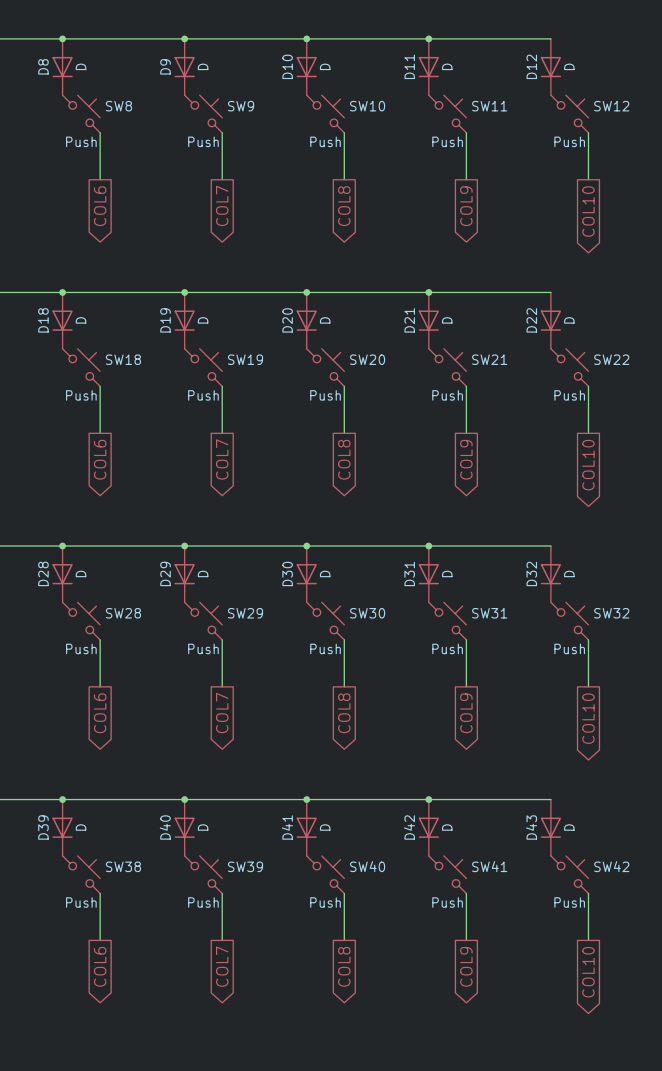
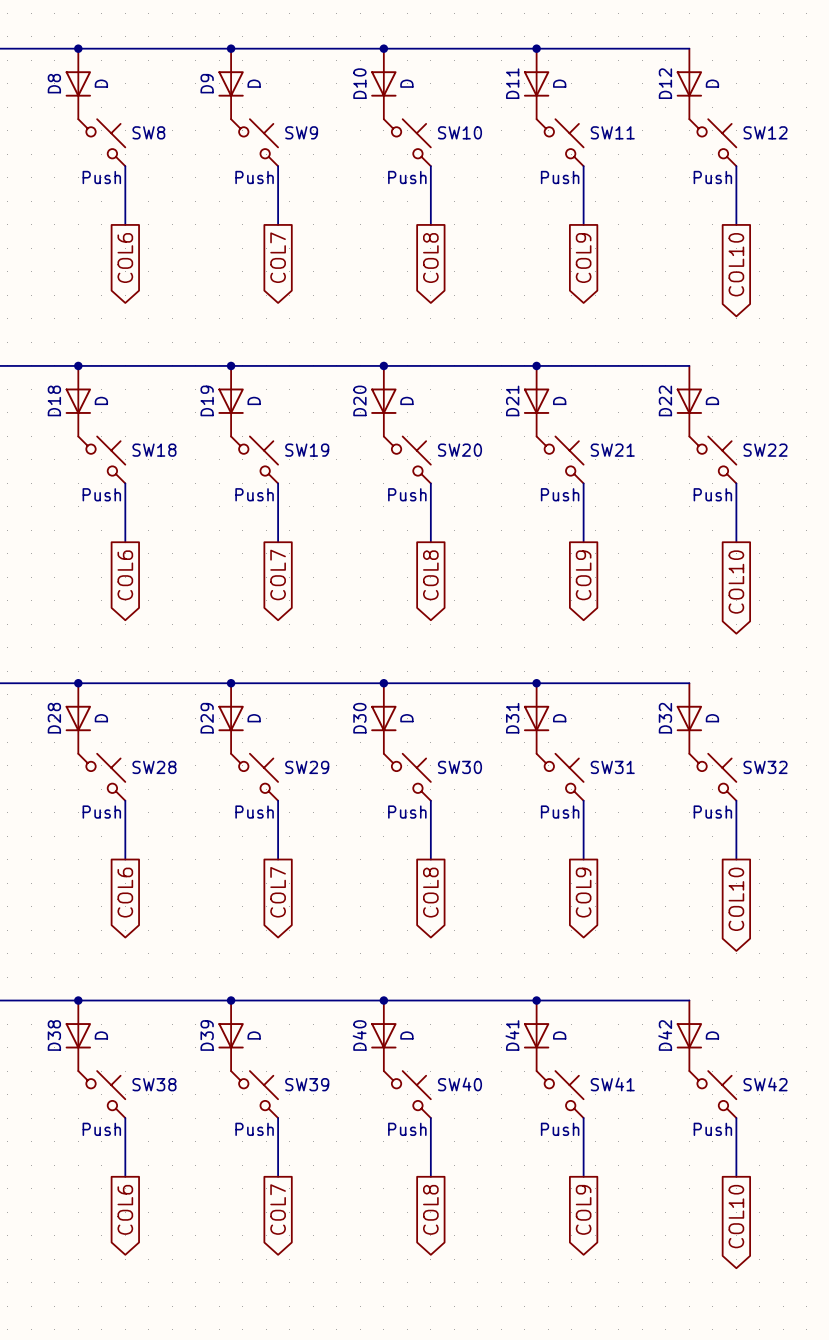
D39 name: D39 (43, 827) -> D38 (54, 1035)
D40 name: D40 (165, 827) -> D39 (207, 1035)
D41 name: D41 (287, 827) -> D40 (359, 1035)
D42 name: D42 (409, 827) -> D41 (512, 1035)
D43 name: D43 (531, 827) -> D42 (665, 1035)

